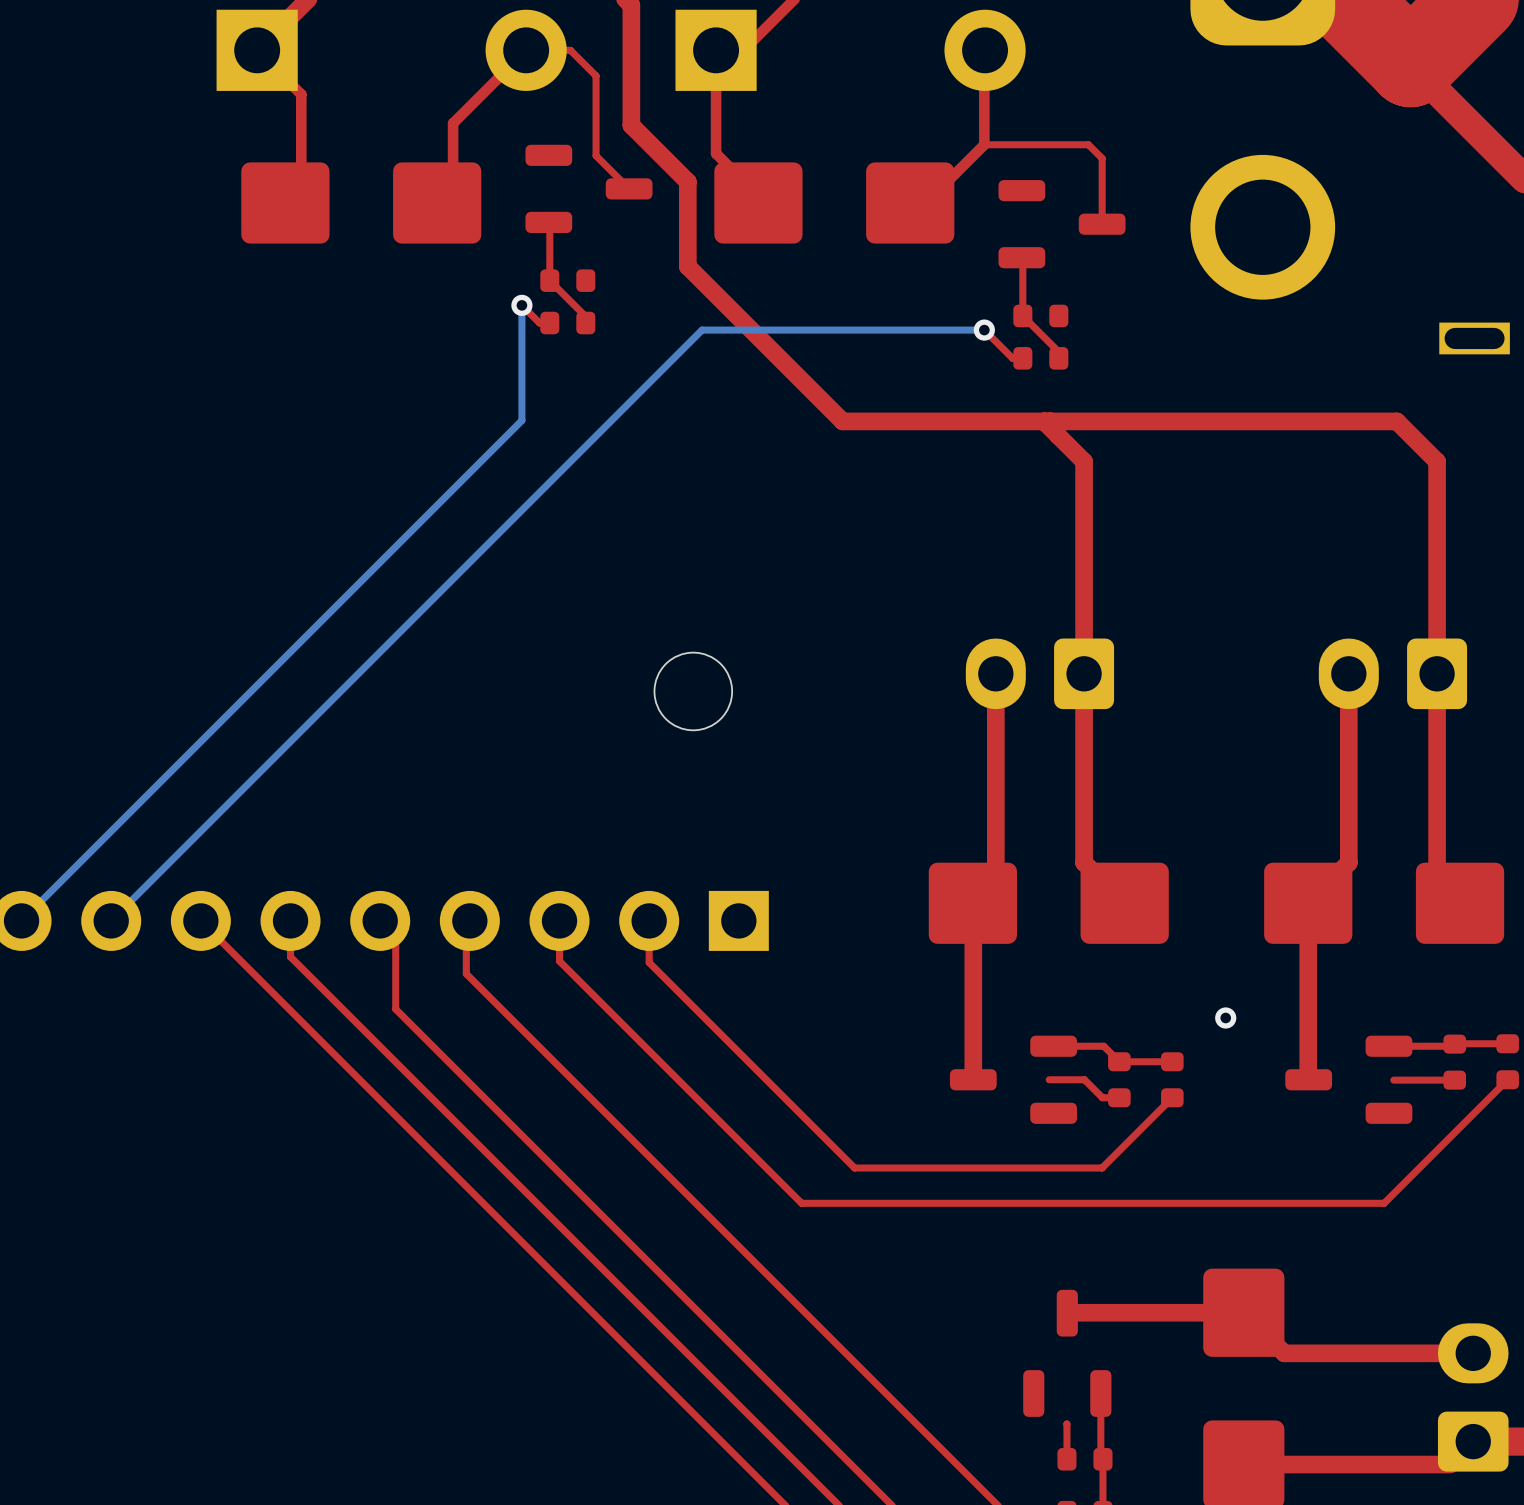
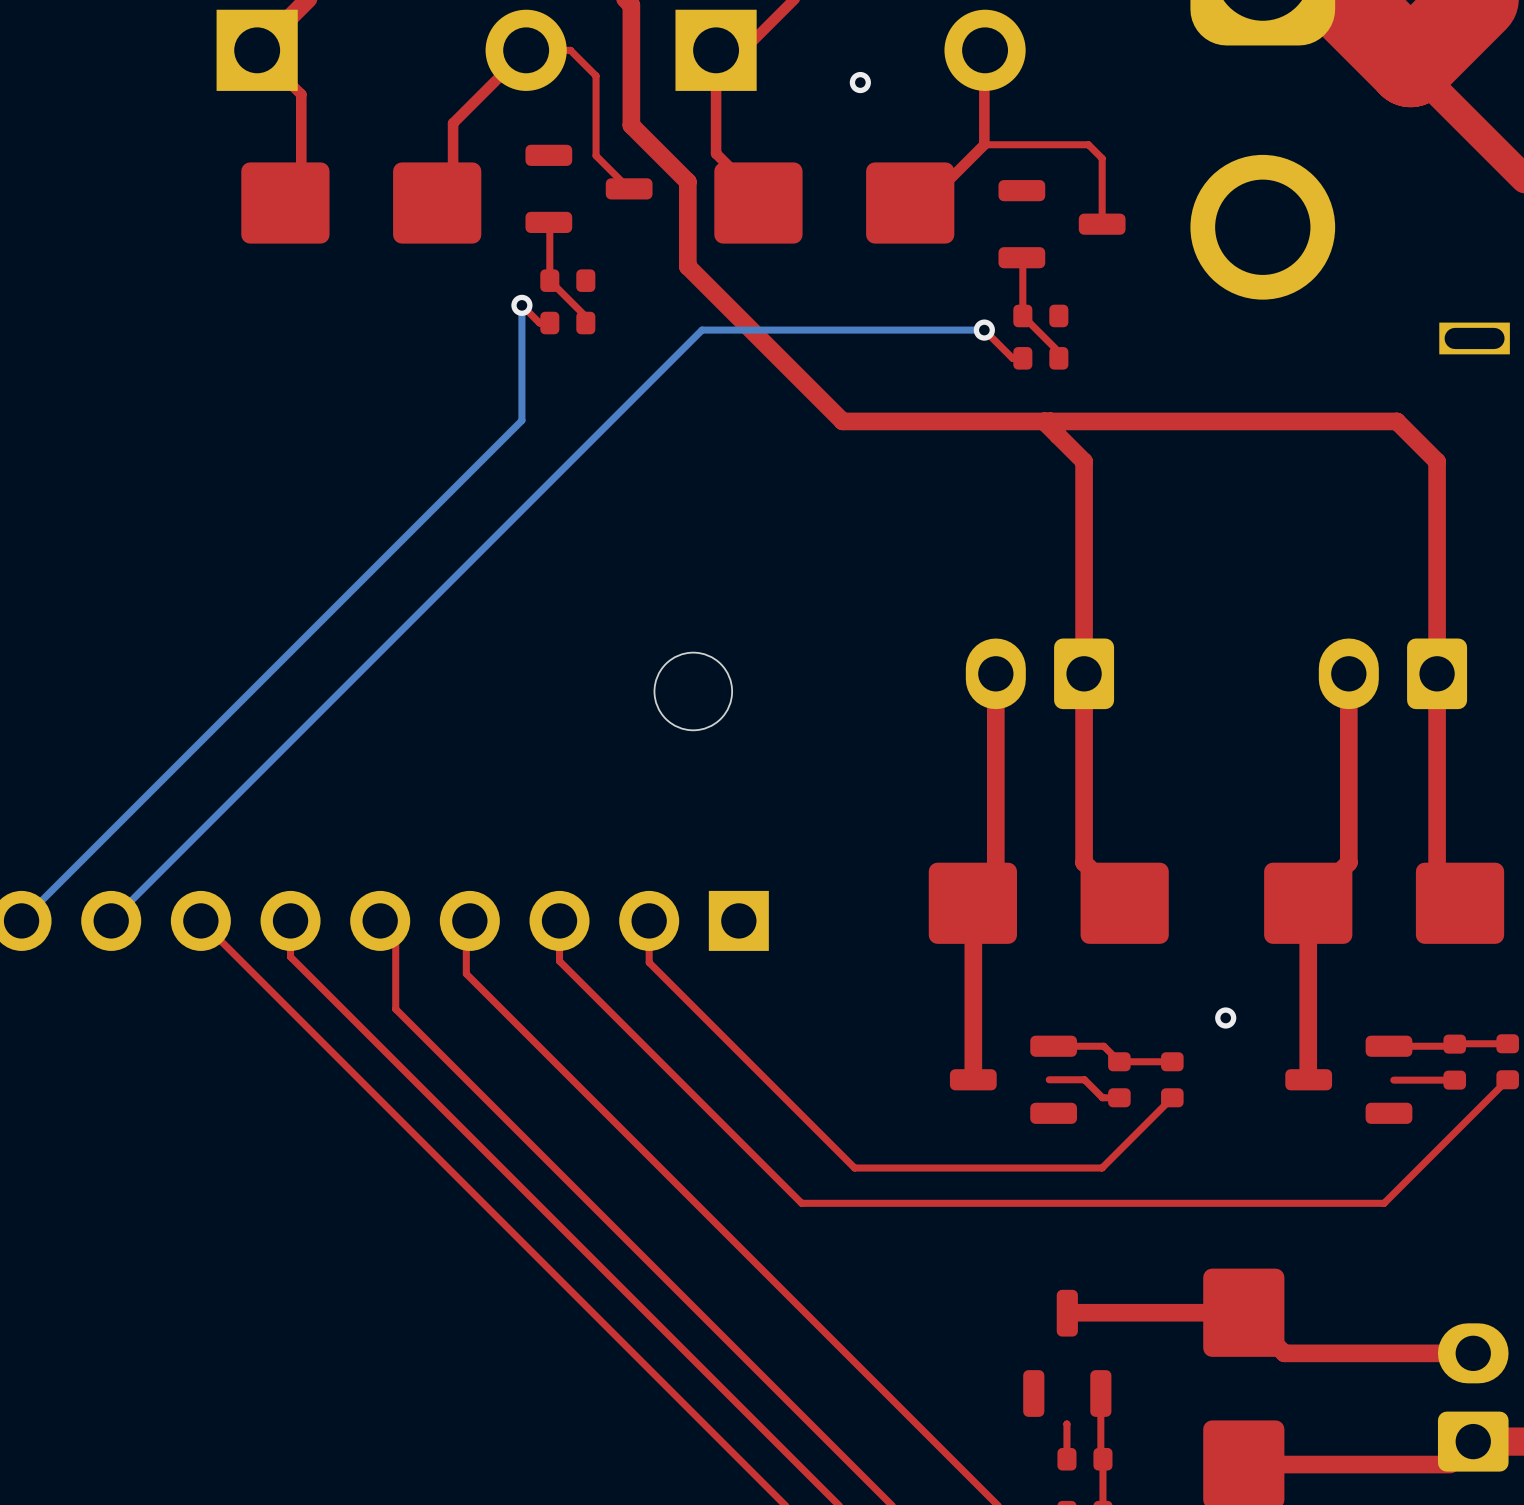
via: none -> (860, 82)

